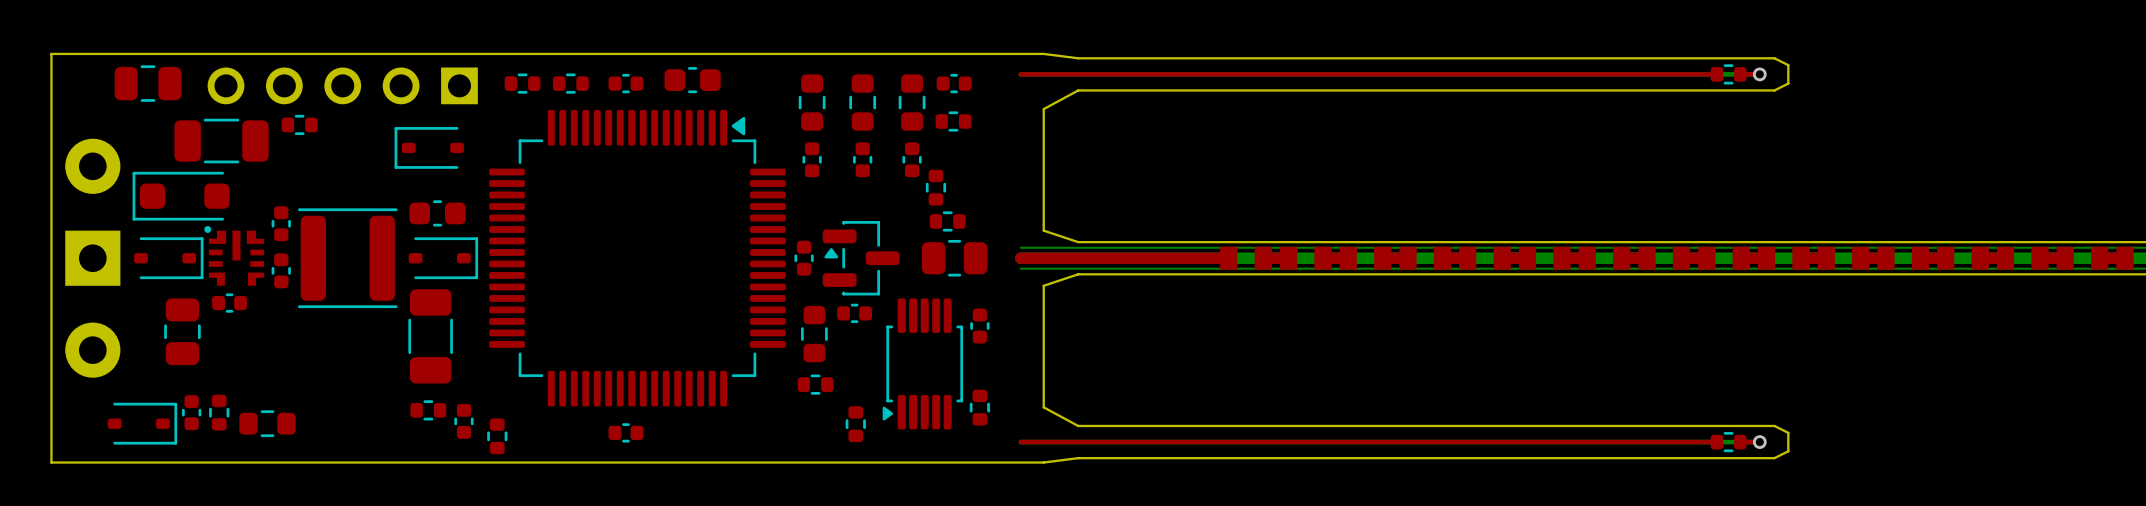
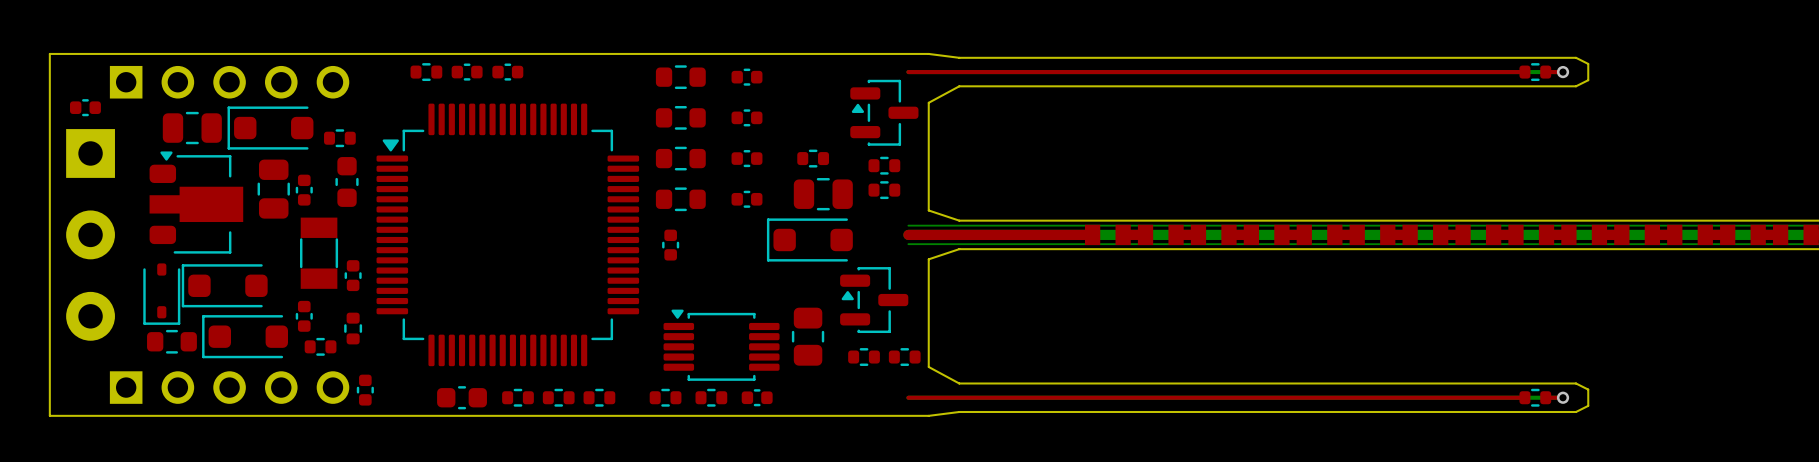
part footprint: [504, 73, 541, 94] -> [451, 63, 483, 81]
part footprint: [552, 73, 589, 94] -> [492, 63, 524, 81]
part: none -> (426, 72)
part: (692, 80) -> none
part: none -> (680, 77)
part: none -> (746, 77)
part rotation: 0° (147, 83) -> 90° clockwise (273, 189)
part position: (147, 83) -> (273, 189)
part: (625, 83) -> none
part: (954, 83) -> none
part rotation: 0° (342, 85) -> 180° (229, 82)
part: (812, 102) -> none
part: (862, 102) -> none
part: (912, 102) -> none
part: none -> (85, 107)
part footprint: [281, 114, 318, 136] -> [227, 106, 314, 150]
part footprint: [174, 118, 269, 164] -> [162, 111, 222, 145]
part: (953, 121) -> none
part: none -> (680, 117)
part: none -> (746, 117)
part footprint: [65, 138, 121, 378] -> [66, 129, 115, 341]
part footprint: [902, 142, 922, 178] -> [797, 149, 830, 168]
part: (429, 147) -> none
part: none -> (339, 138)
part: (812, 159) -> none
part: (862, 159) -> none
part: none -> (680, 158)
part: none -> (746, 158)
part: none -> (884, 165)
part: (935, 187) -> none
part: (181, 196) -> none
part: none -> (304, 190)
part: none -> (884, 190)
part footprint: [297, 208, 398, 309] -> [300, 217, 339, 289]
part: none -> (823, 194)
part rotation: 0° (437, 213) -> 90° clockwise (347, 181)
part position: (437, 213) -> (347, 181)
part: none -> (680, 199)
part: none -> (746, 199)
part: none -> (196, 202)
part: (947, 221) -> none
part: (281, 223) -> none
part: (234, 255) -> none
part: (168, 258) -> none
part: (443, 258) -> none
part rotation: 0° (637, 258) -> 90° counterclockwise (507, 234)
part: (804, 258) -> none
part position: (861, 258) -> (884, 112)
part: (954, 258) -> none
part: none -> (809, 239)
part: none -> (670, 245)
part: (281, 270) -> none
part footprint: [164, 298, 201, 366] -> [143, 263, 181, 325]
part footprint: [882, 298, 964, 430] -> [791, 307, 825, 366]
part: (229, 303) -> none
part: none -> (353, 275)
part footprint: [970, 308, 990, 344] -> [840, 267, 909, 334]
part: (854, 313) -> none
part: none -> (224, 285)
part: (814, 334) -> none
part: (430, 336) -> none
part: none -> (304, 316)
part: none -> (353, 328)
part: none -> (245, 336)
part footprint: [797, 374, 834, 395] -> [663, 309, 780, 381]
part: none -> (171, 341)
part: none -> (320, 346)
part: none -> (904, 357)
part footprint: [845, 406, 866, 443] -> [741, 389, 773, 407]
part rotation: 0° (979, 407) -> 90° clockwise (864, 357)
part footprint: [239, 410, 296, 438] -> [109, 371, 350, 404]
part: (428, 410) -> none
part: (191, 412) -> none
part: (219, 412) -> none
part footprint: [487, 418, 508, 455] -> [437, 386, 487, 410]
part position: (463, 421) -> (365, 390)
part: (142, 423) -> none
part footprint: [608, 423, 644, 443] -> [542, 388, 575, 407]
part: none -> (518, 397)
part: none -> (599, 397)
part: none -> (665, 397)
part: none -> (711, 397)

